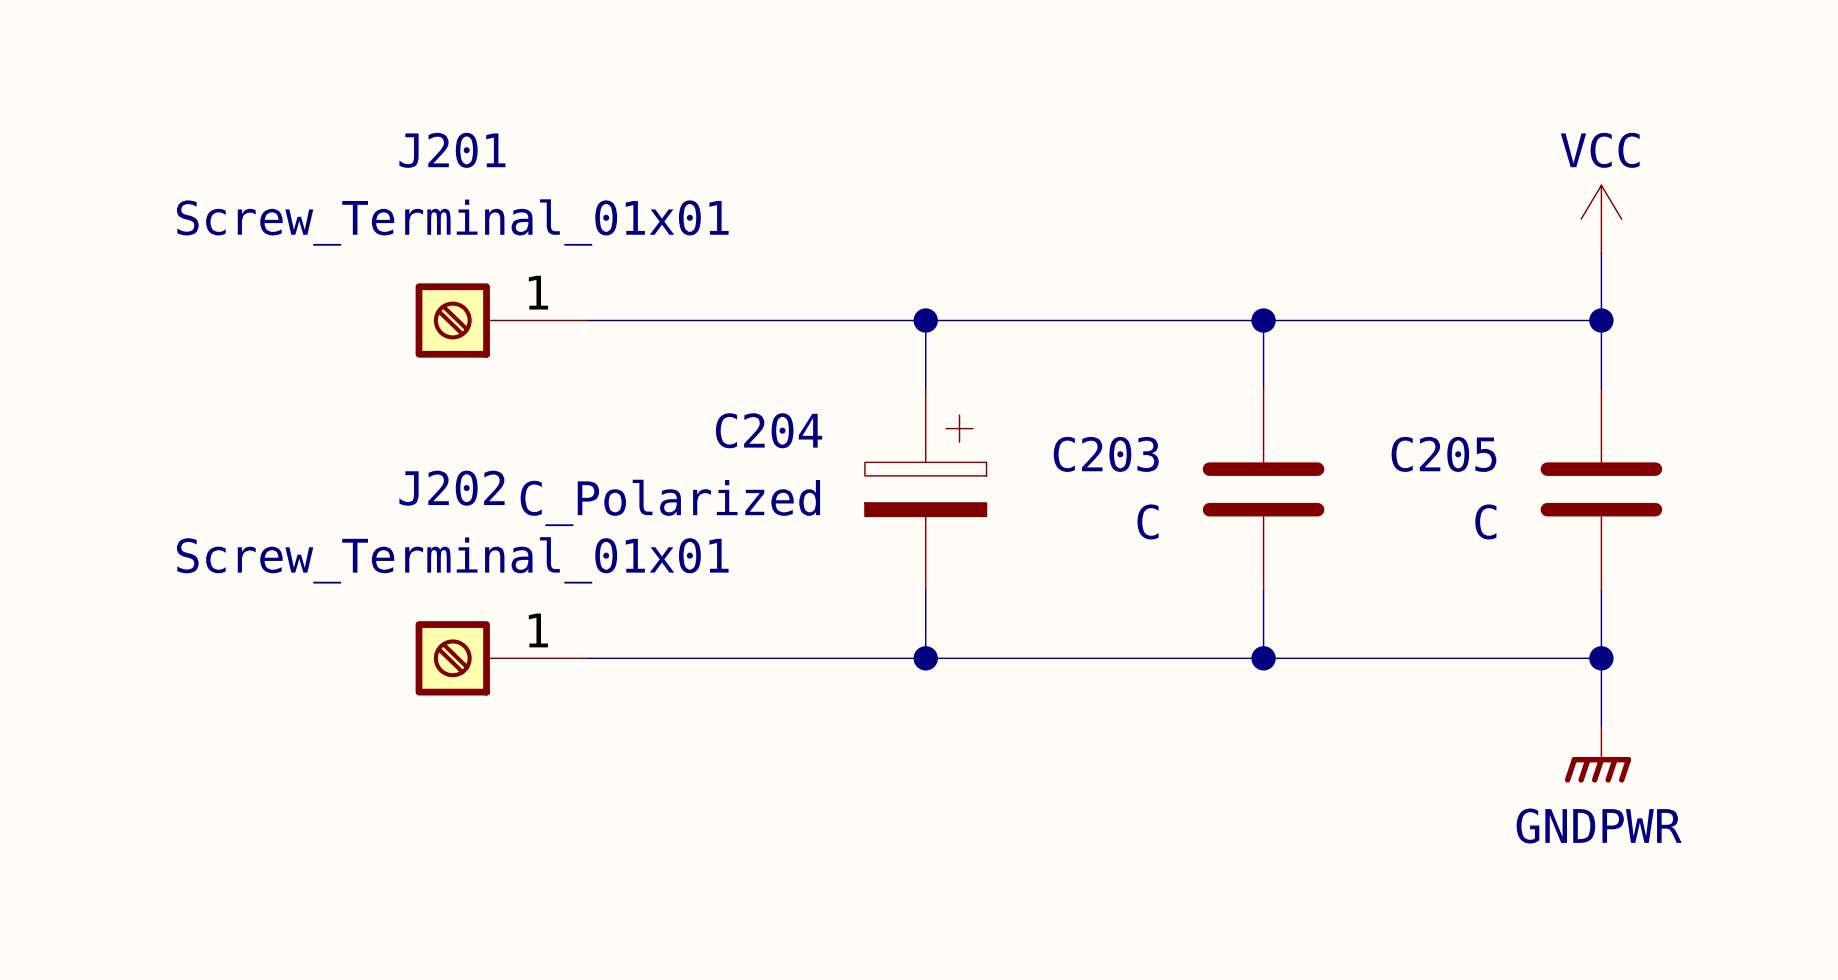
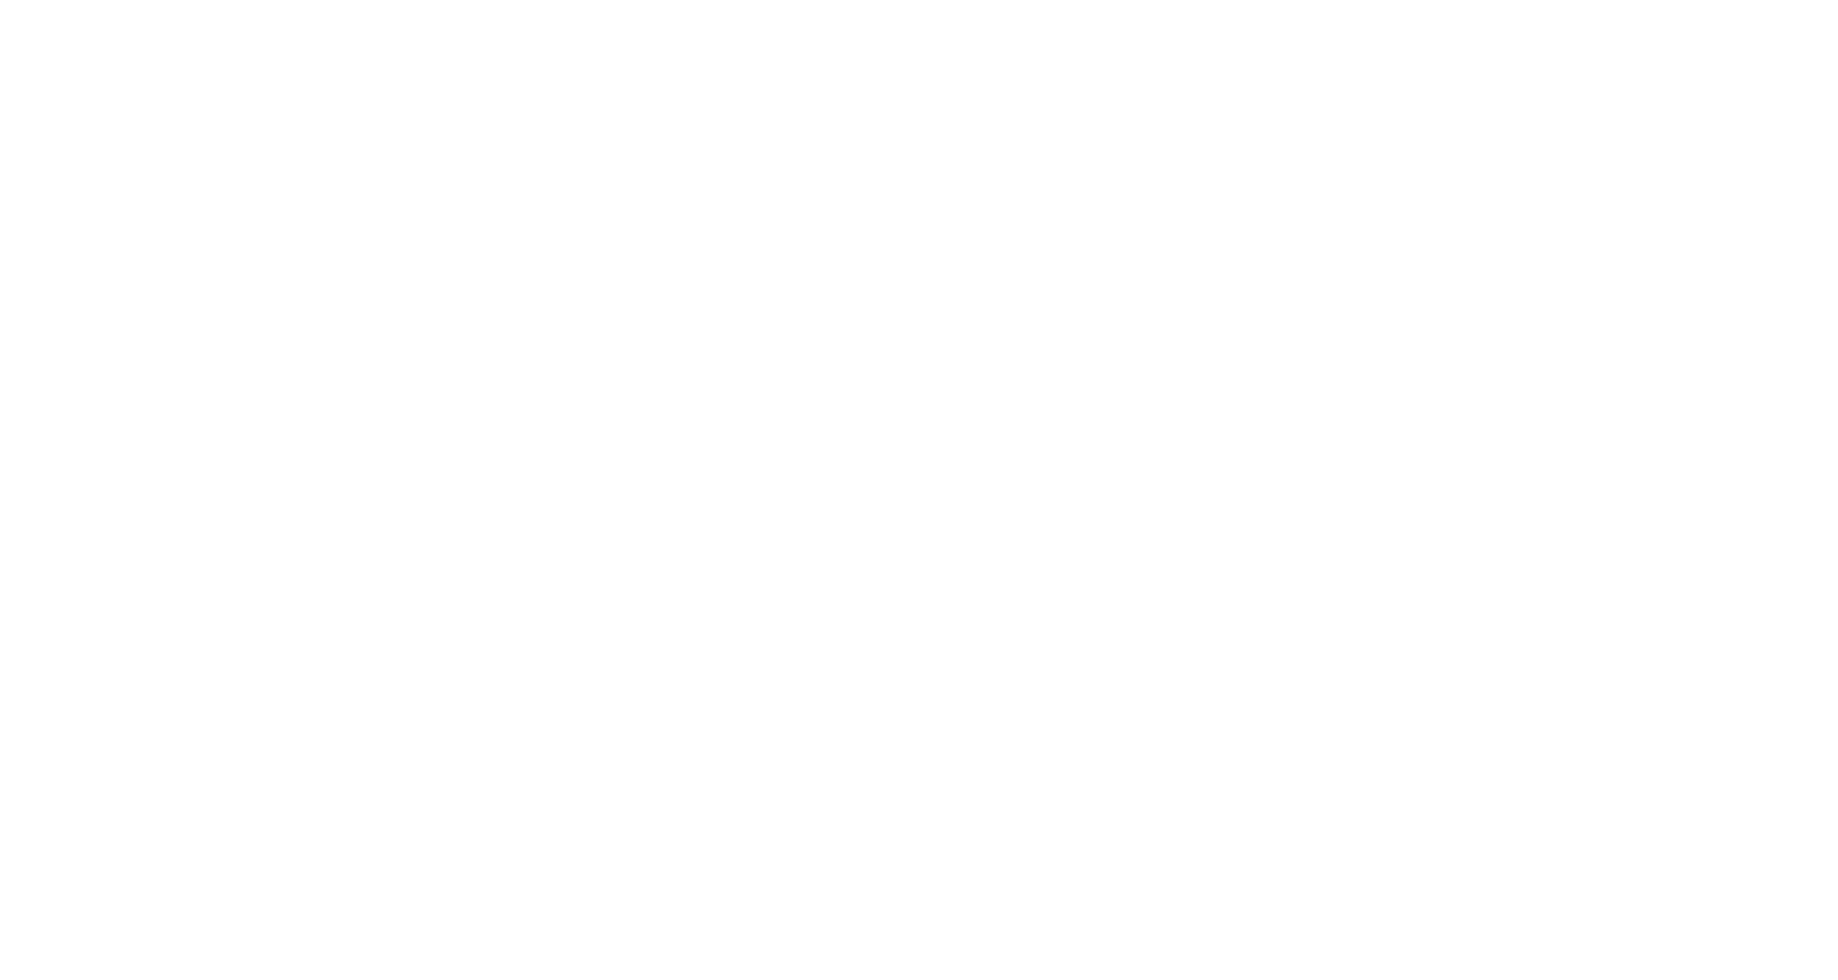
power symbol: VCC (1601, 219) -> none
wire: (1601, 252) (1601, 388) -> none
J201: Screw_Terminal_01x01 (501, 320) -> none
wire: (587, 320) (1601, 320) -> none
wire: (925, 320) (925, 388) -> none
junction: (925, 320) -> none
wire: (1263, 320) (1263, 388) -> none
junction: (1263, 320) -> none
junction: (1601, 320) -> none
C204: C_Polarized (925, 489) -> none
C203: C (1263, 489) -> none
C205: C (1601, 489) -> none
wire: (925, 590) (925, 658) -> none
wire: (1263, 590) (1263, 658) -> none
wire: (1601, 590) (1601, 725) -> none
J202: Screw_Terminal_01x01 (501, 658) -> none
wire: (587, 658) (1601, 658) -> none
junction: (925, 658) -> none
junction: (1263, 658) -> none
junction: (1601, 658) -> none
power symbol: GNDPWR (1598, 754) -> none

